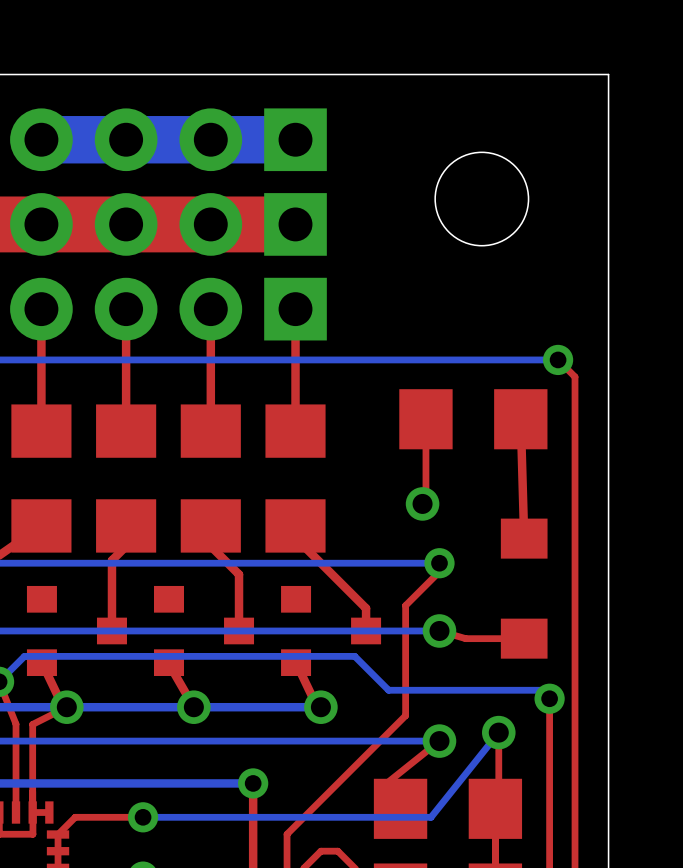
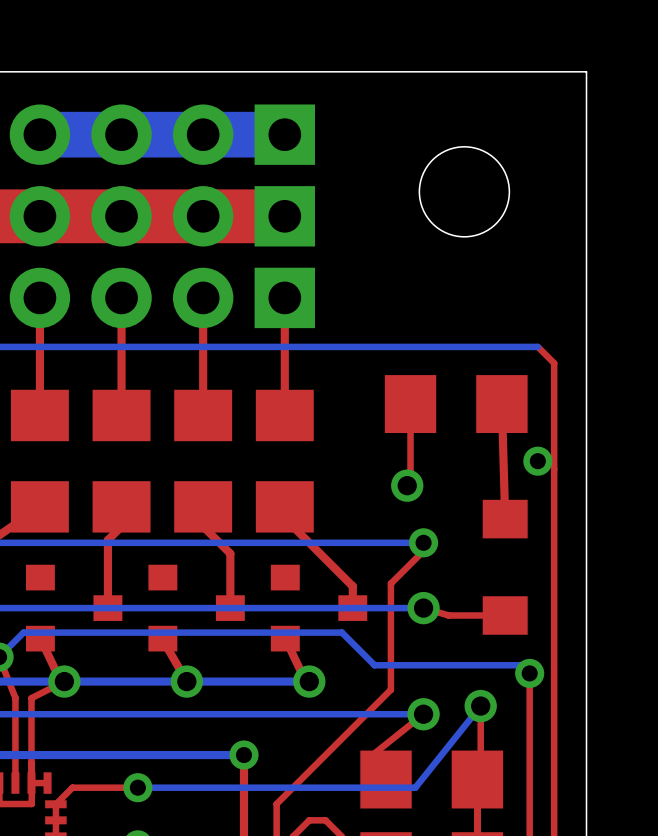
via position: (558, 359) -> (537, 461)

